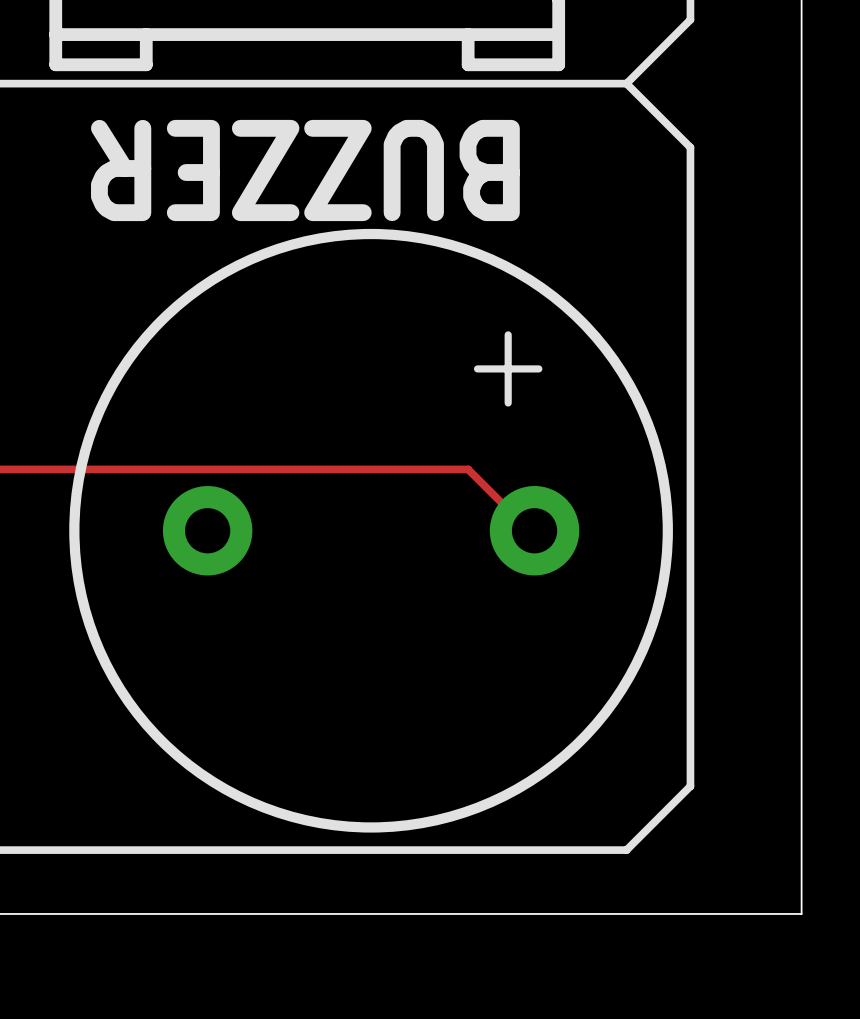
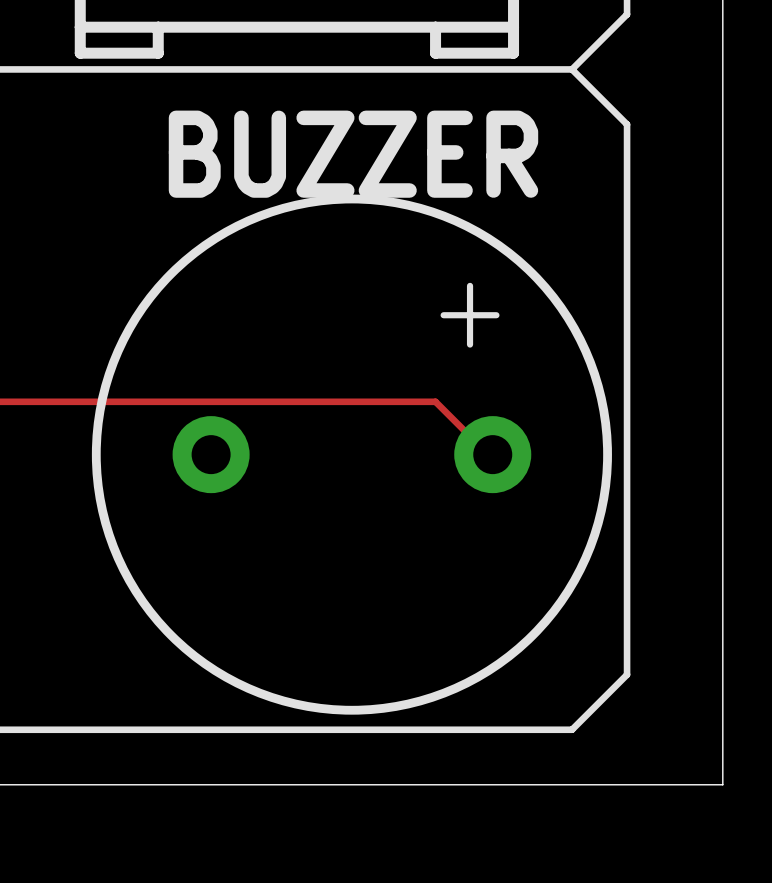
BUZZER name rotation: 0° (305, 170) -> 180° (353, 154)

